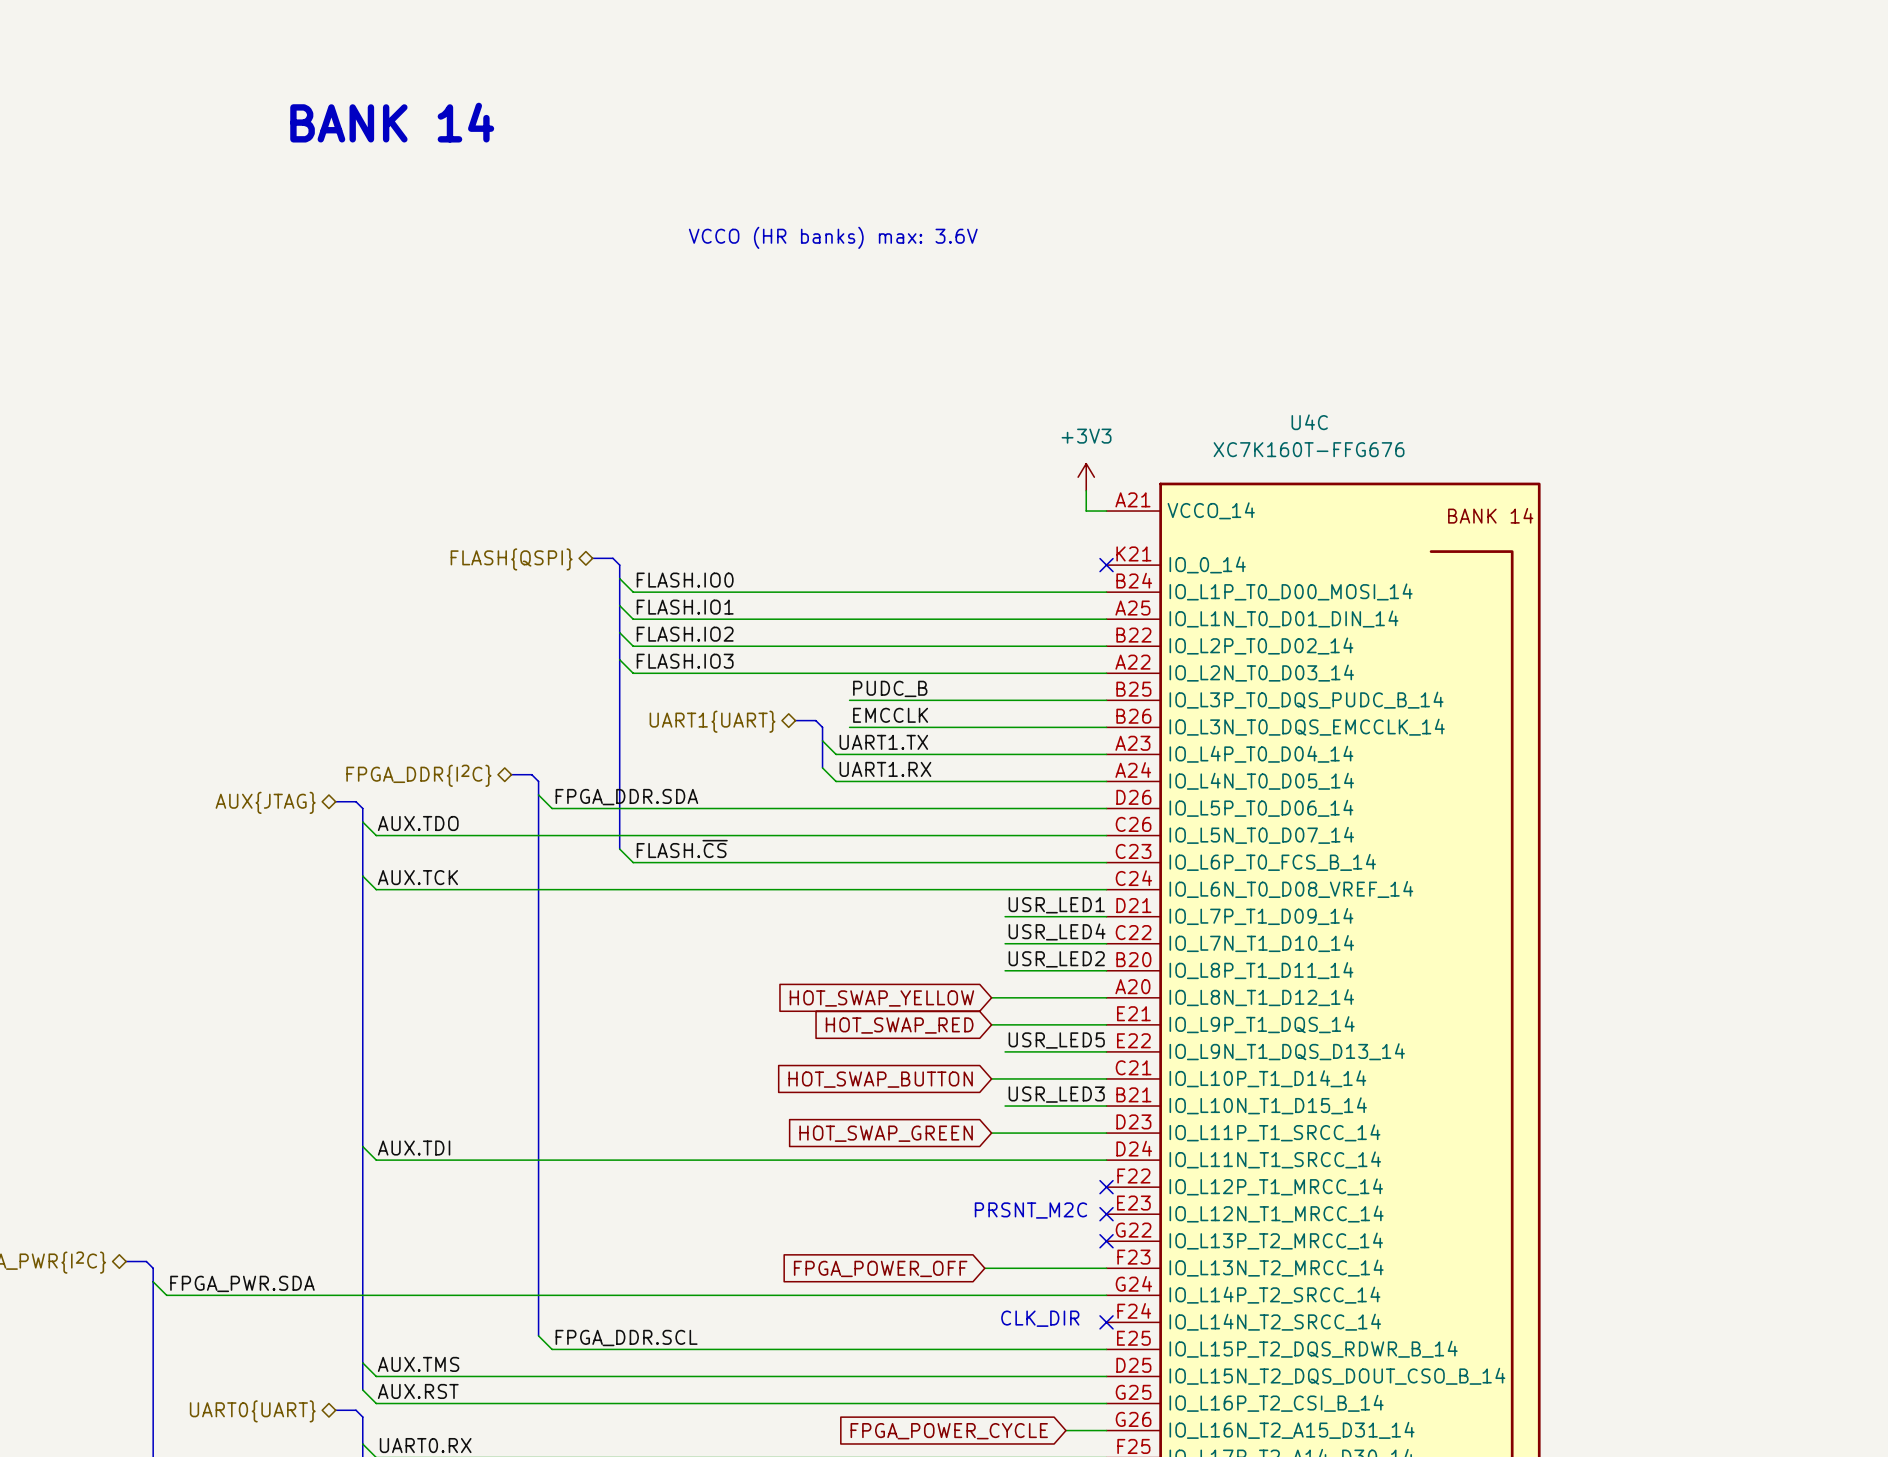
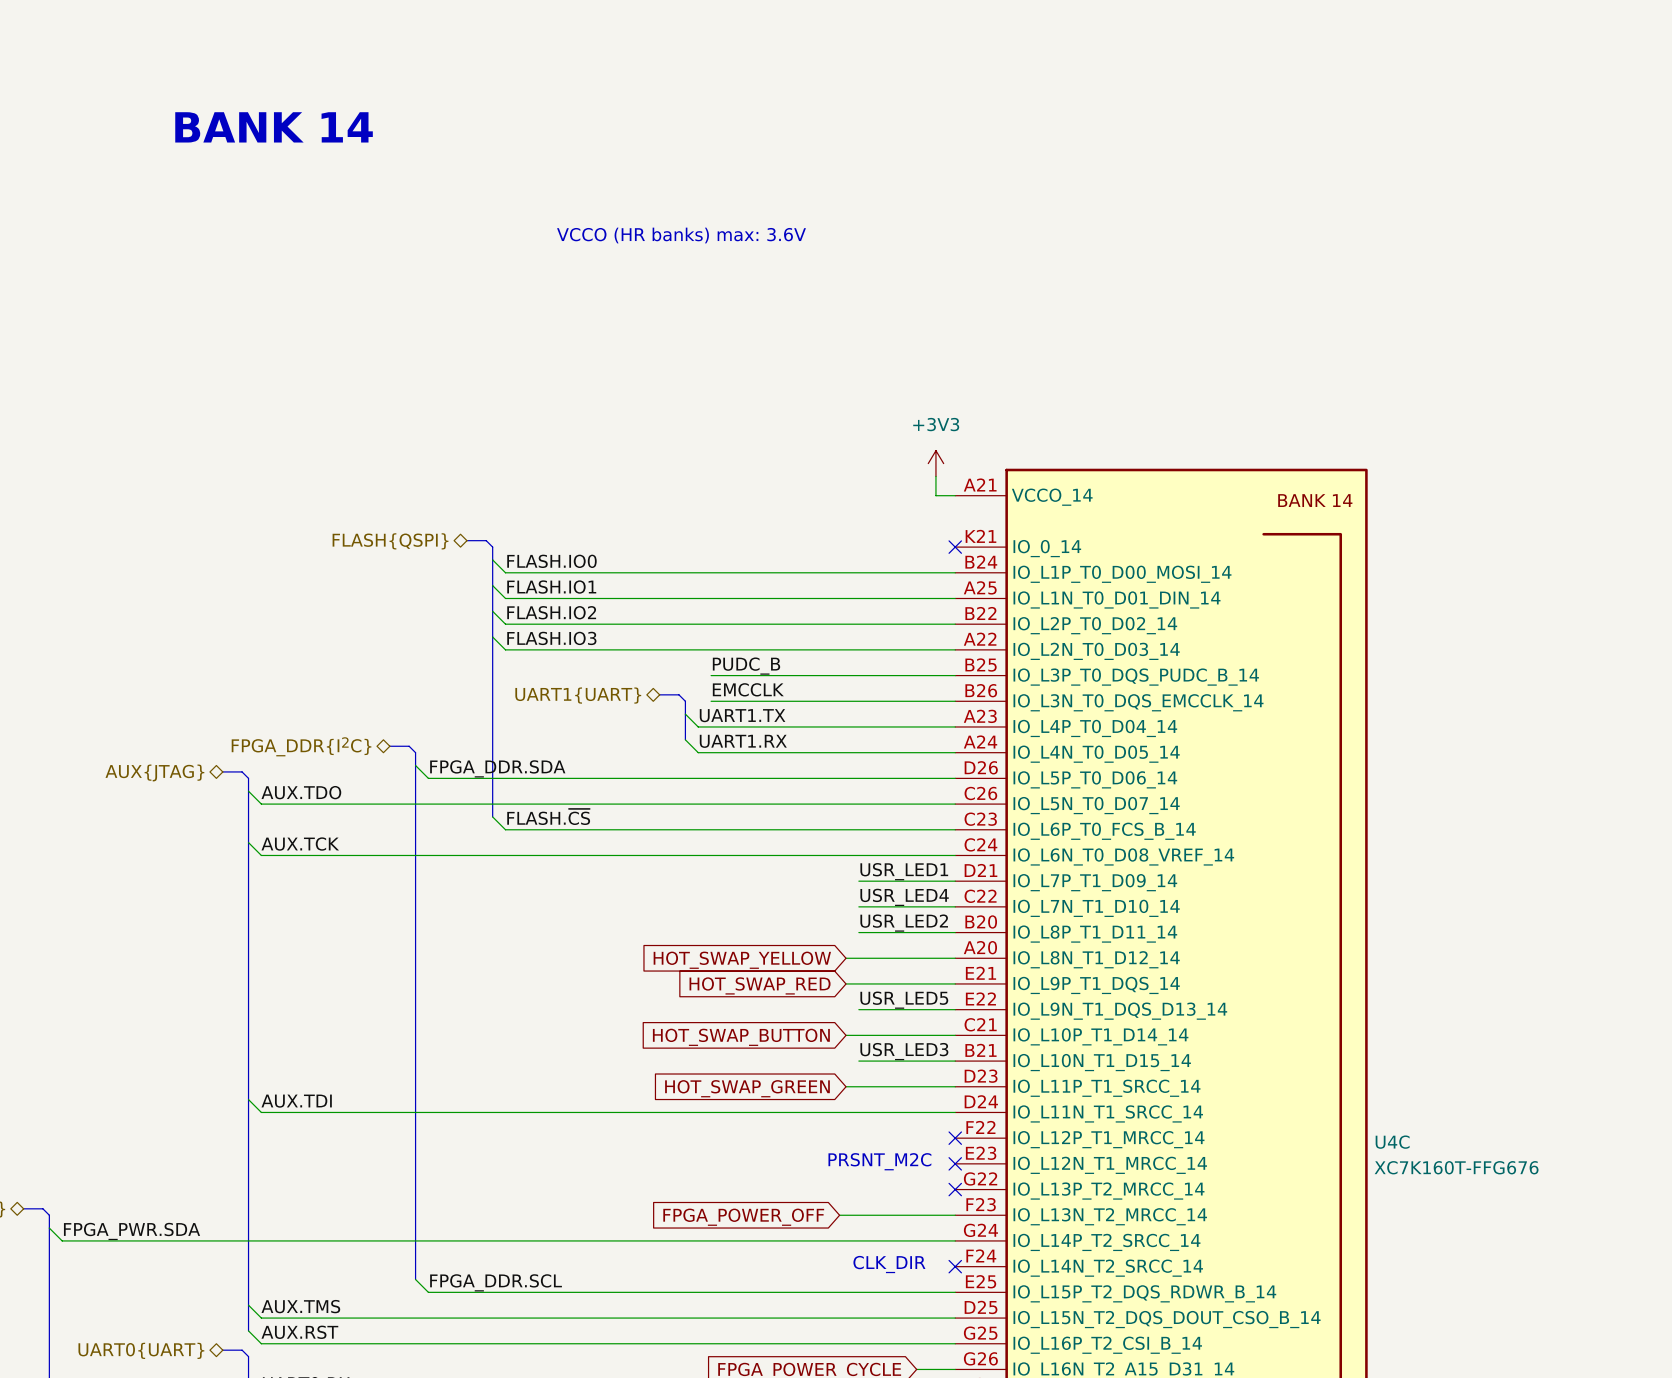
U4C name position: U4C (1309, 422) -> U4C (1392, 1142)
U4C value position: XC7K160T-FFG676 (1309, 449) -> XC7K160T-FFG676 (1456, 1167)

